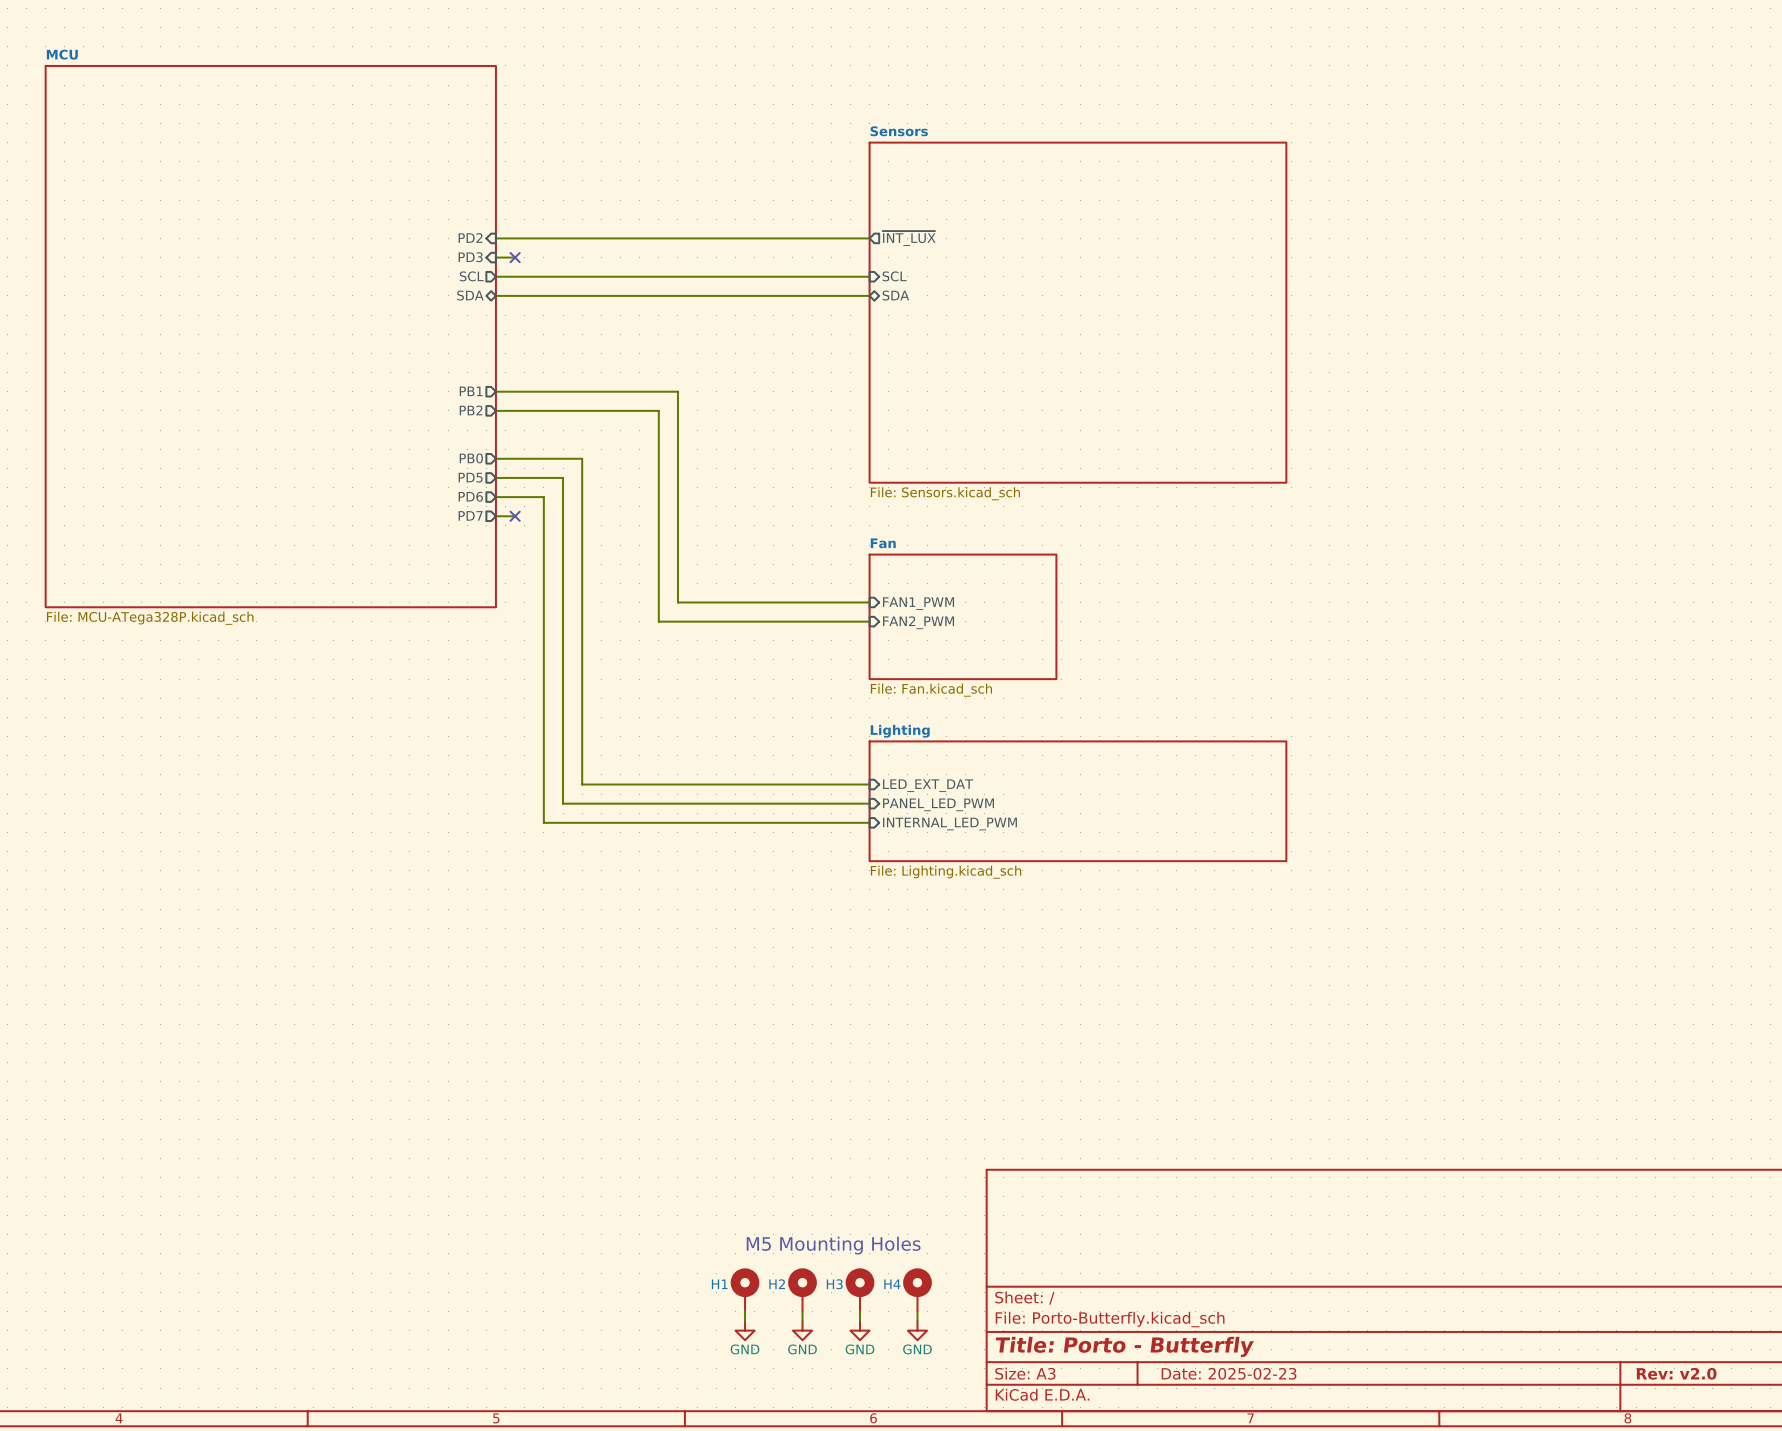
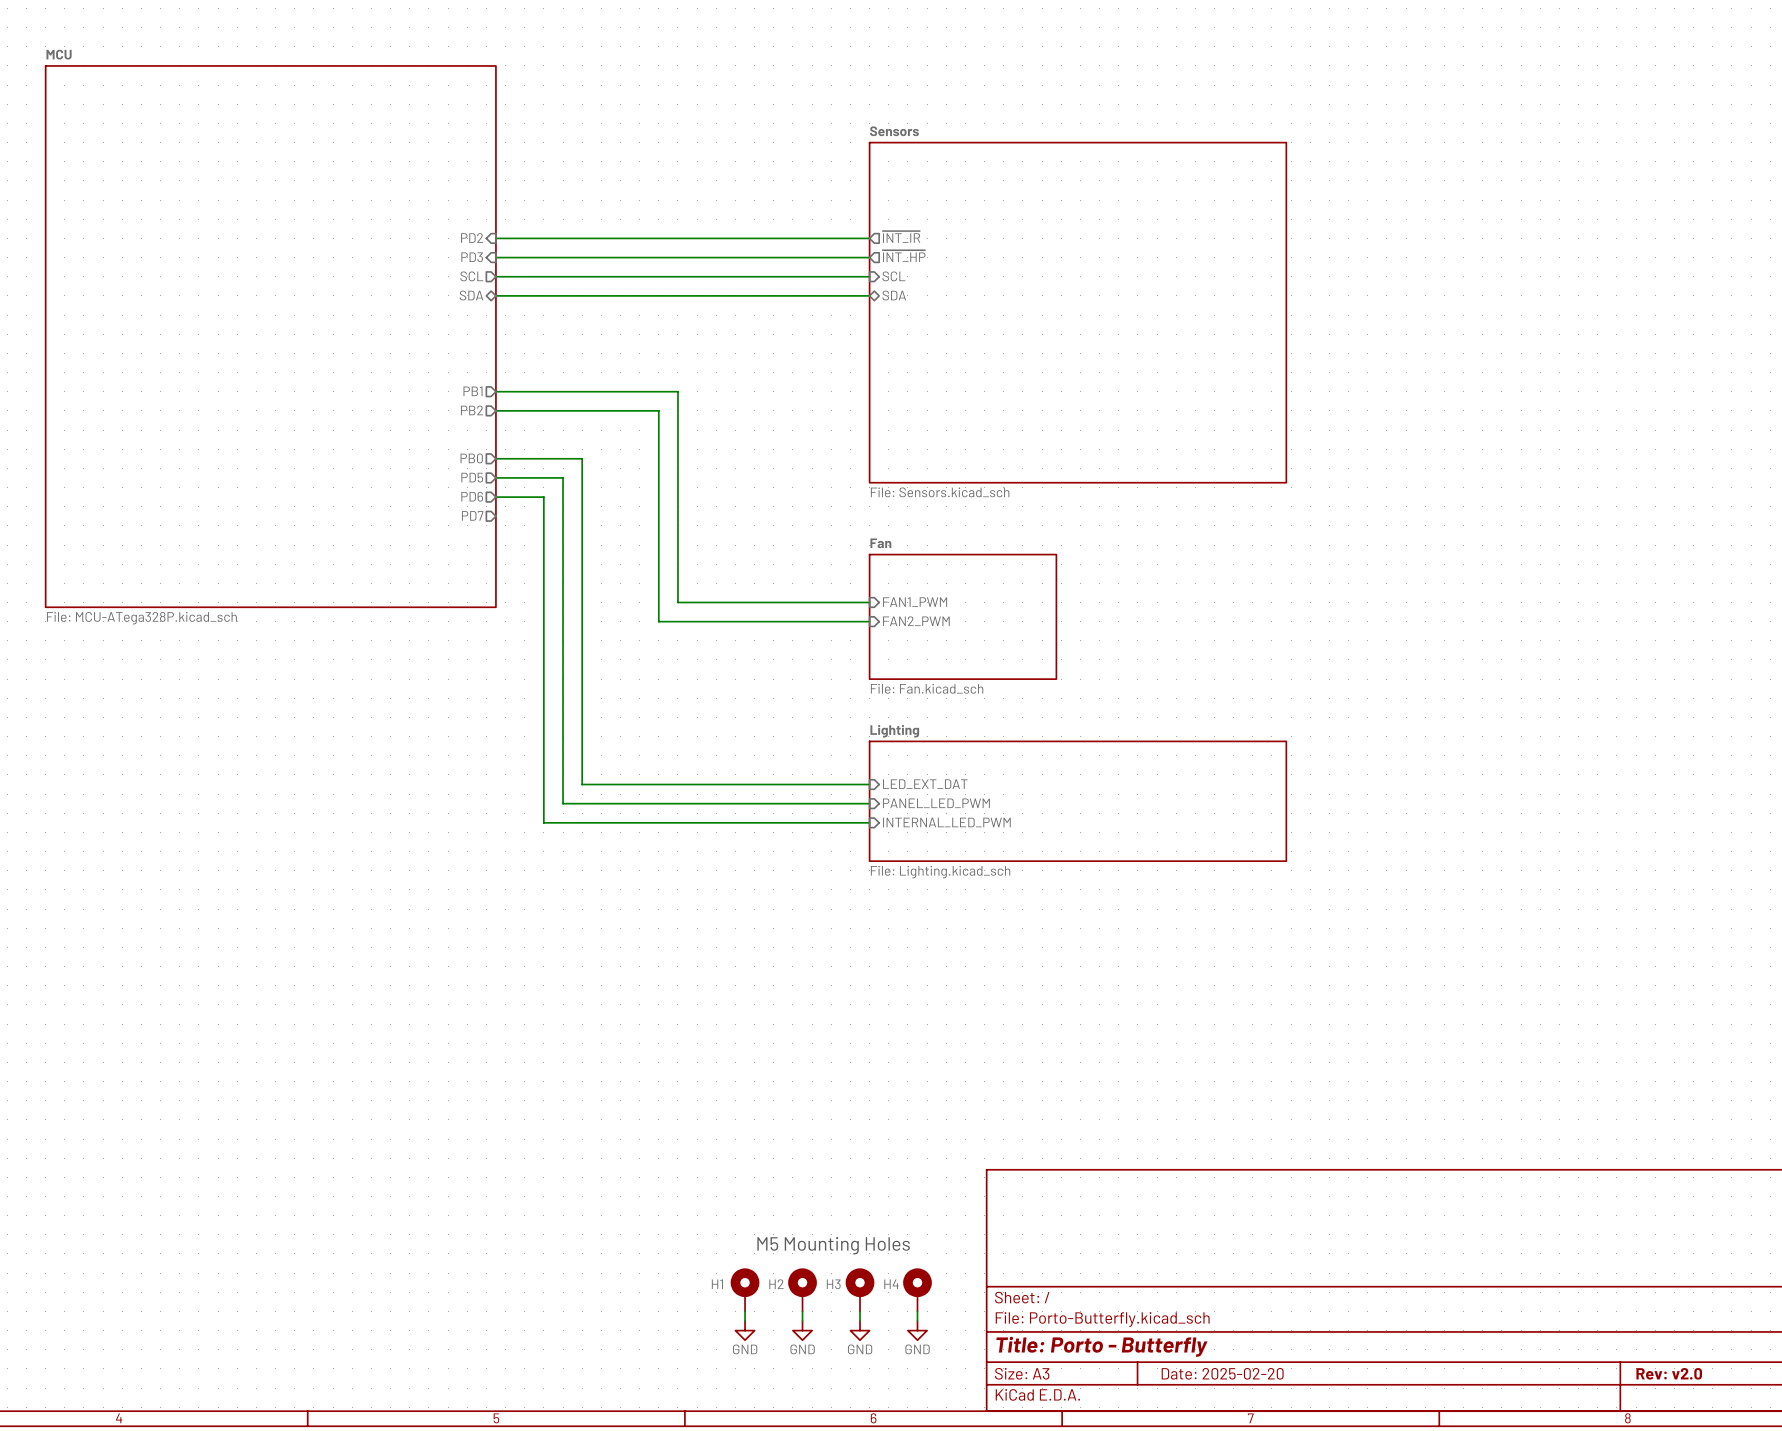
sheet pin: ~{INT_LUX} (909, 238) -> ~{INT_IR} (901, 236)
wire: none -> (515, 257) (869, 257)
no-connect mark: (515, 257) -> none
sheet pin: none -> ~{INT_HP} (904, 256)
wire: (495, 516) (515, 516) -> none
no-connect mark: (515, 516) -> none
title block: Date: 2025-02-23 (1229, 1373) -> Date: 2025-02-20 (1222, 1373)

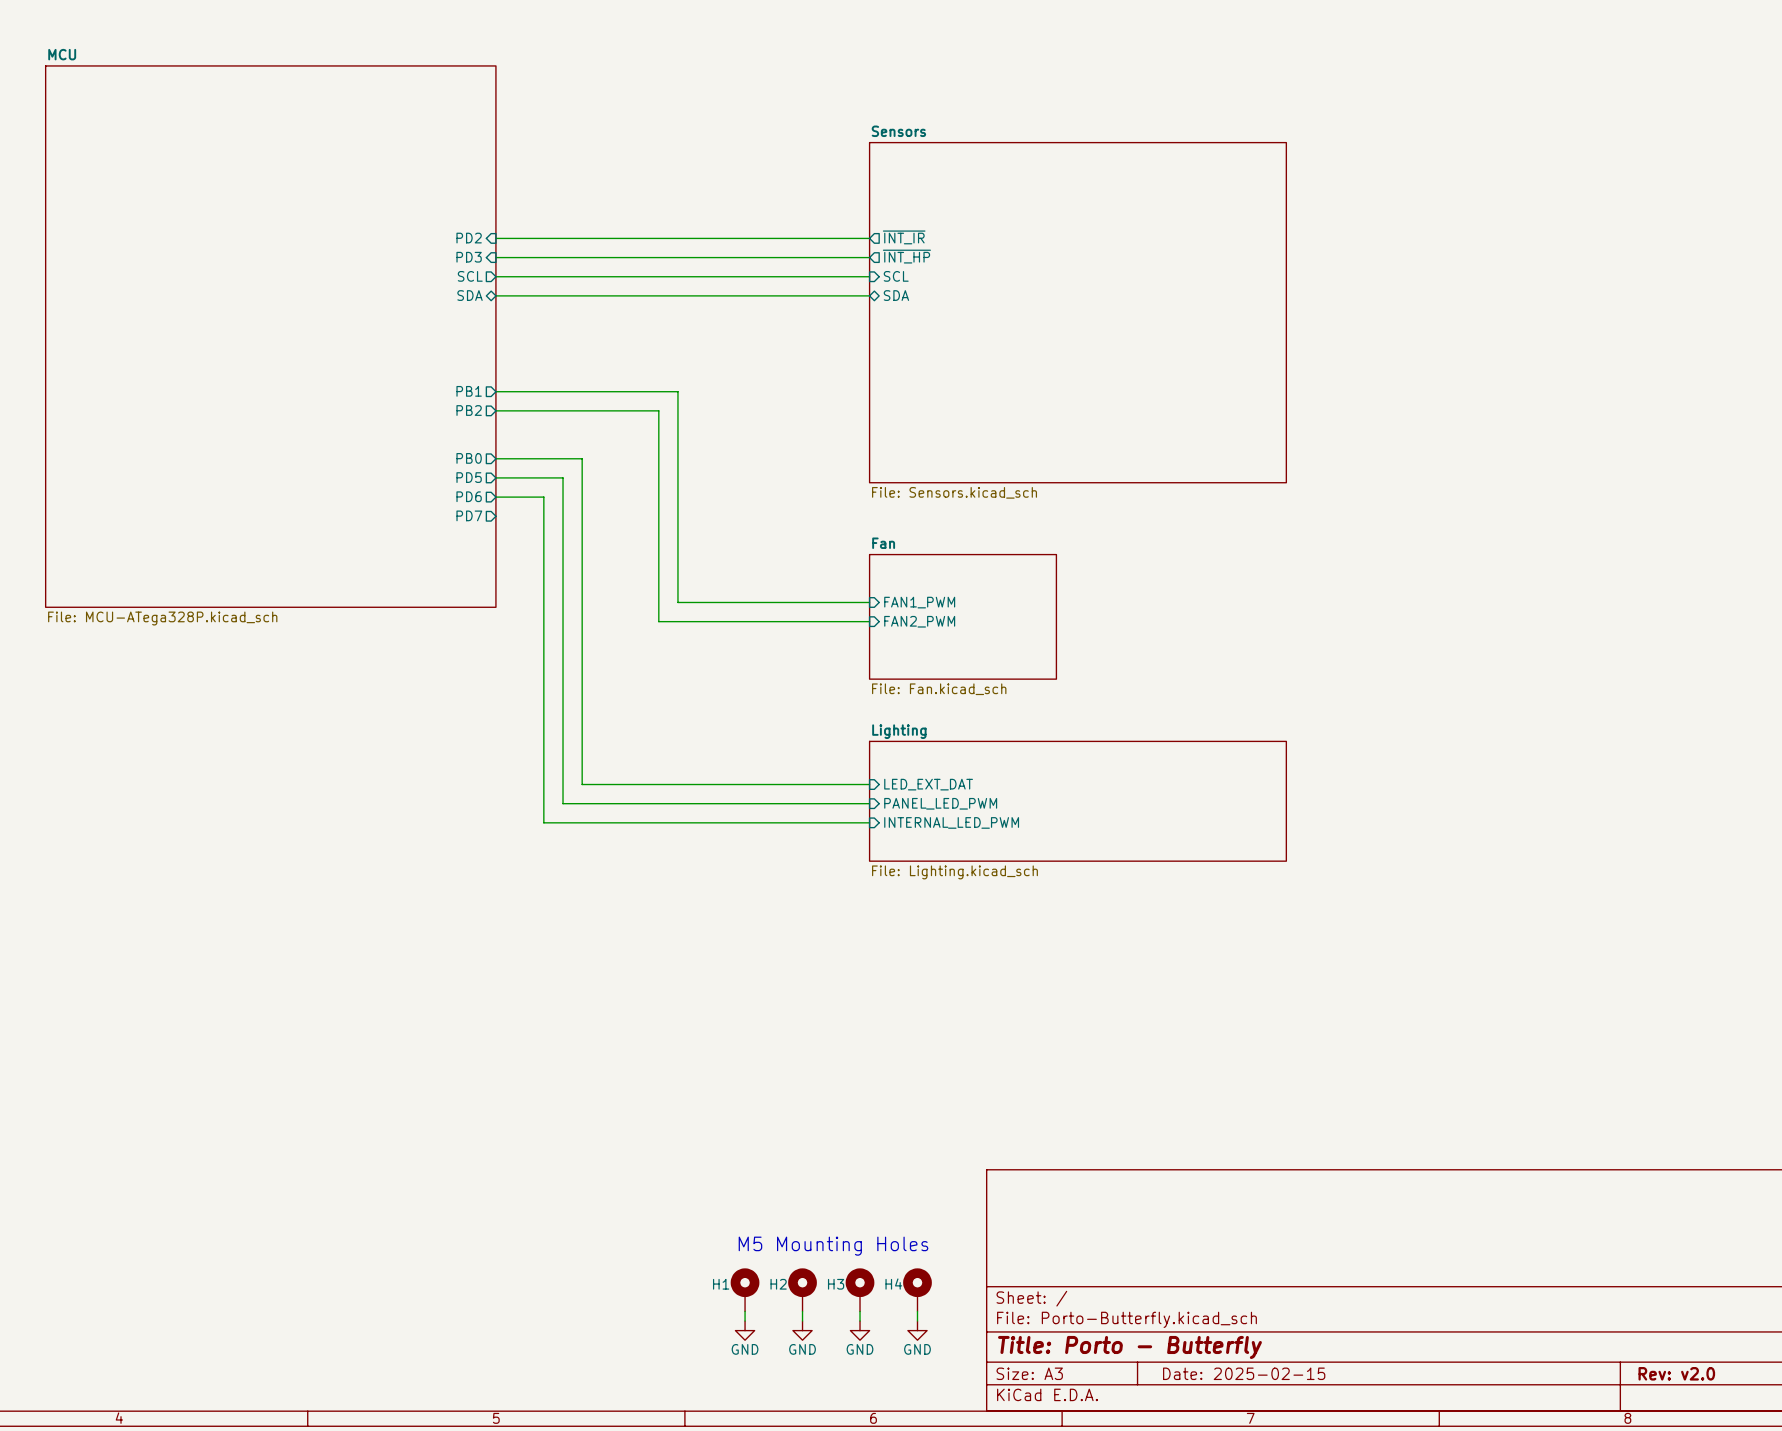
title block: Date: 2025-02-20 (1222, 1373) -> Date: 2025-02-15 (1244, 1373)

